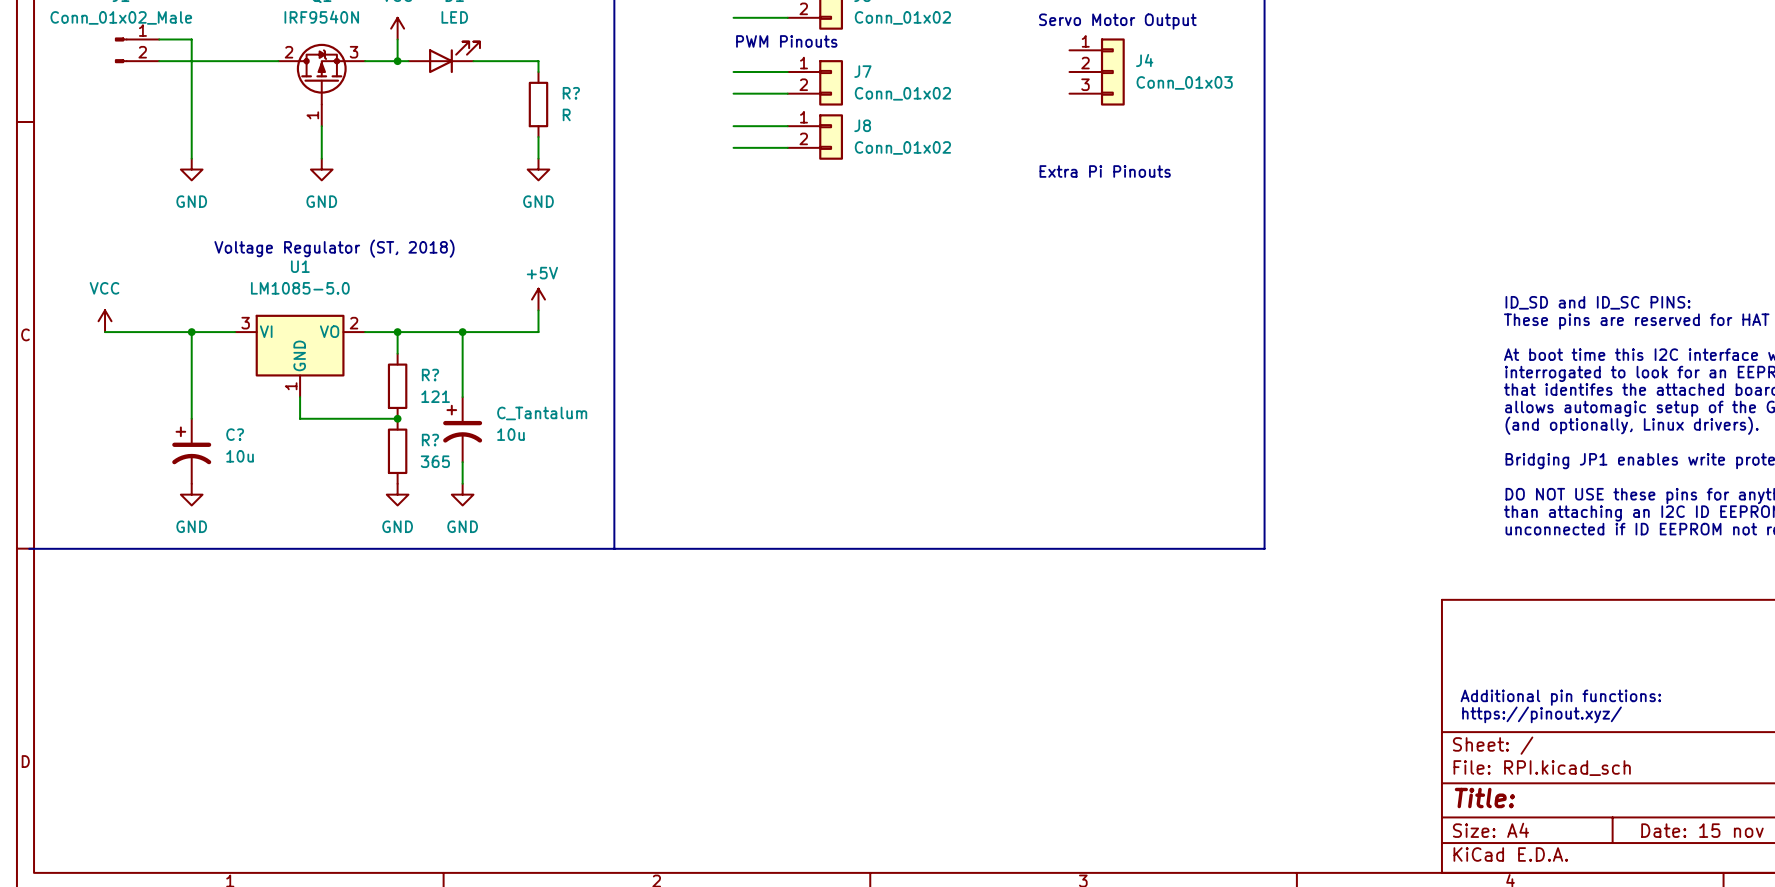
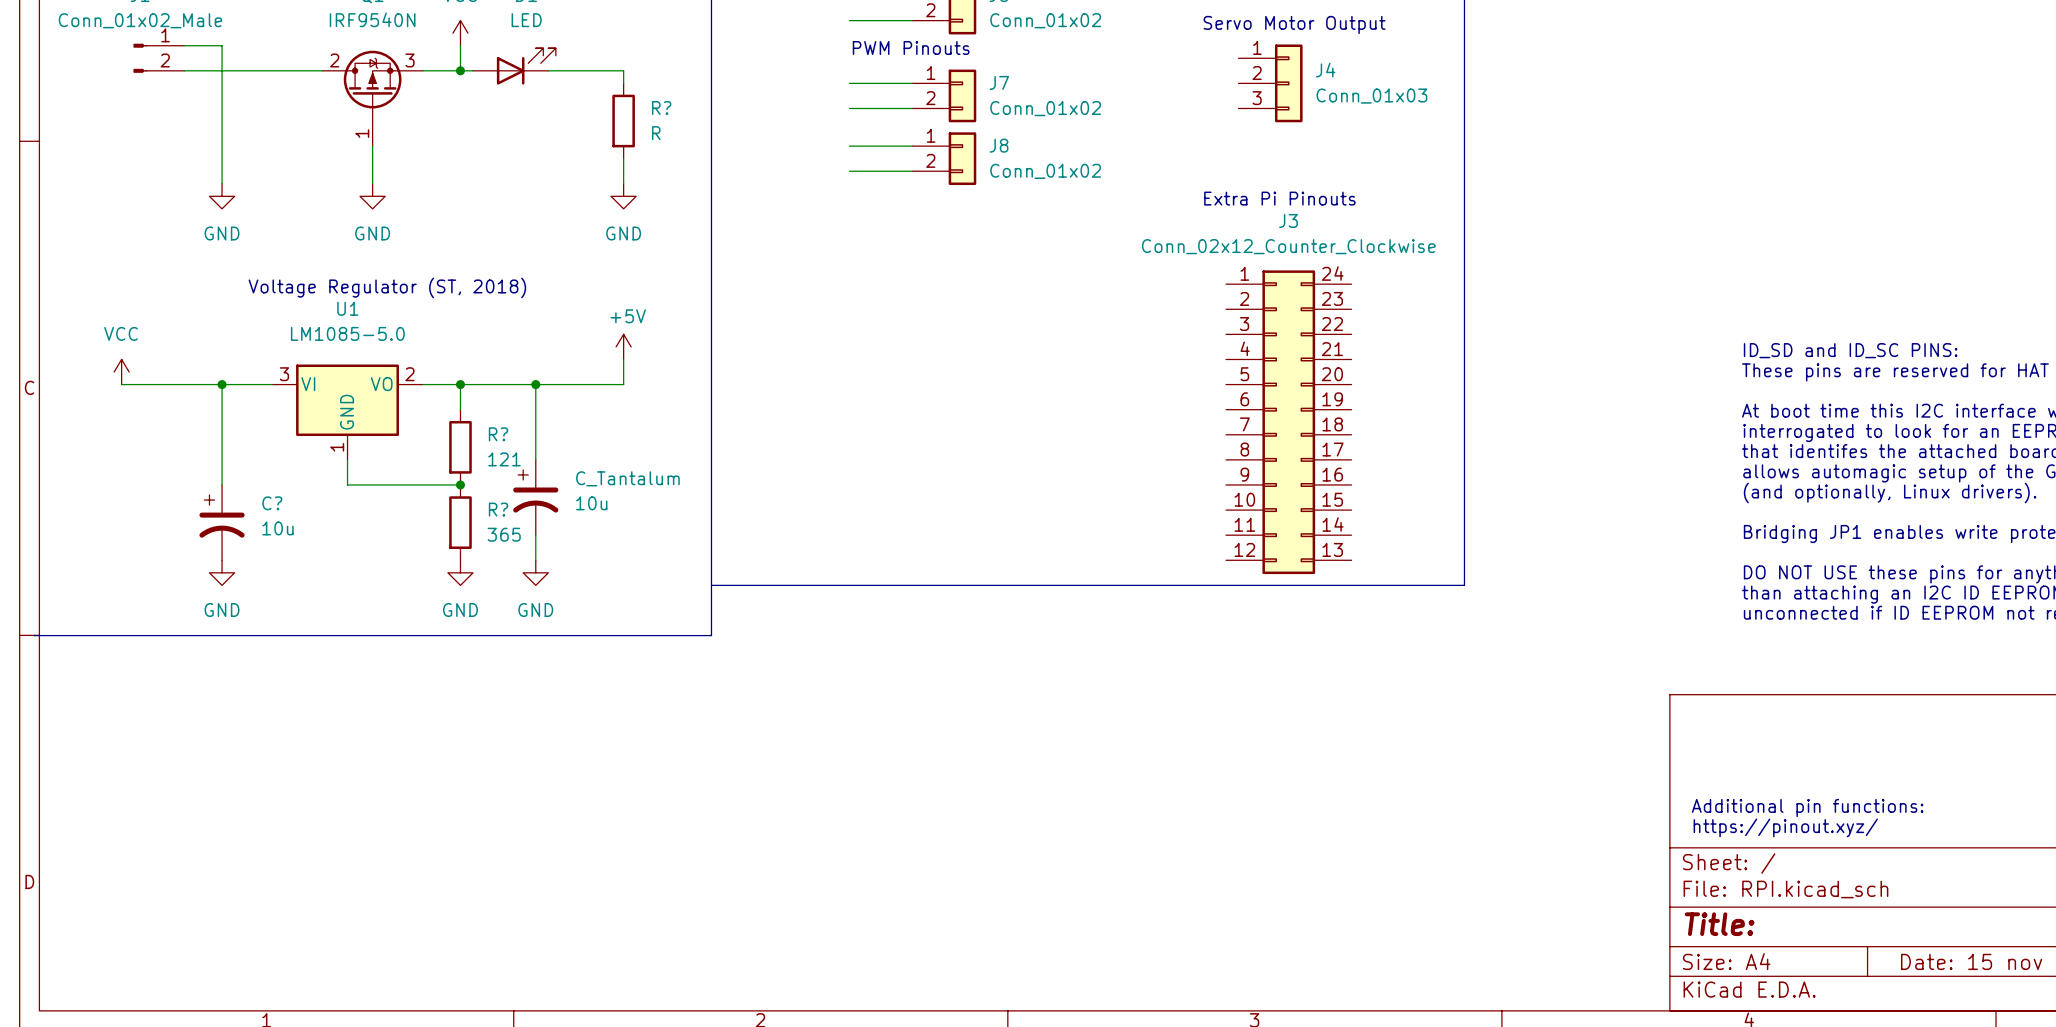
J3: none -> Conn_02x12_Counter_Clockwise (1288, 422)
line: (1264, 505) (1264, 548) (614, 548) -> (1464, 585) (711, 585)

